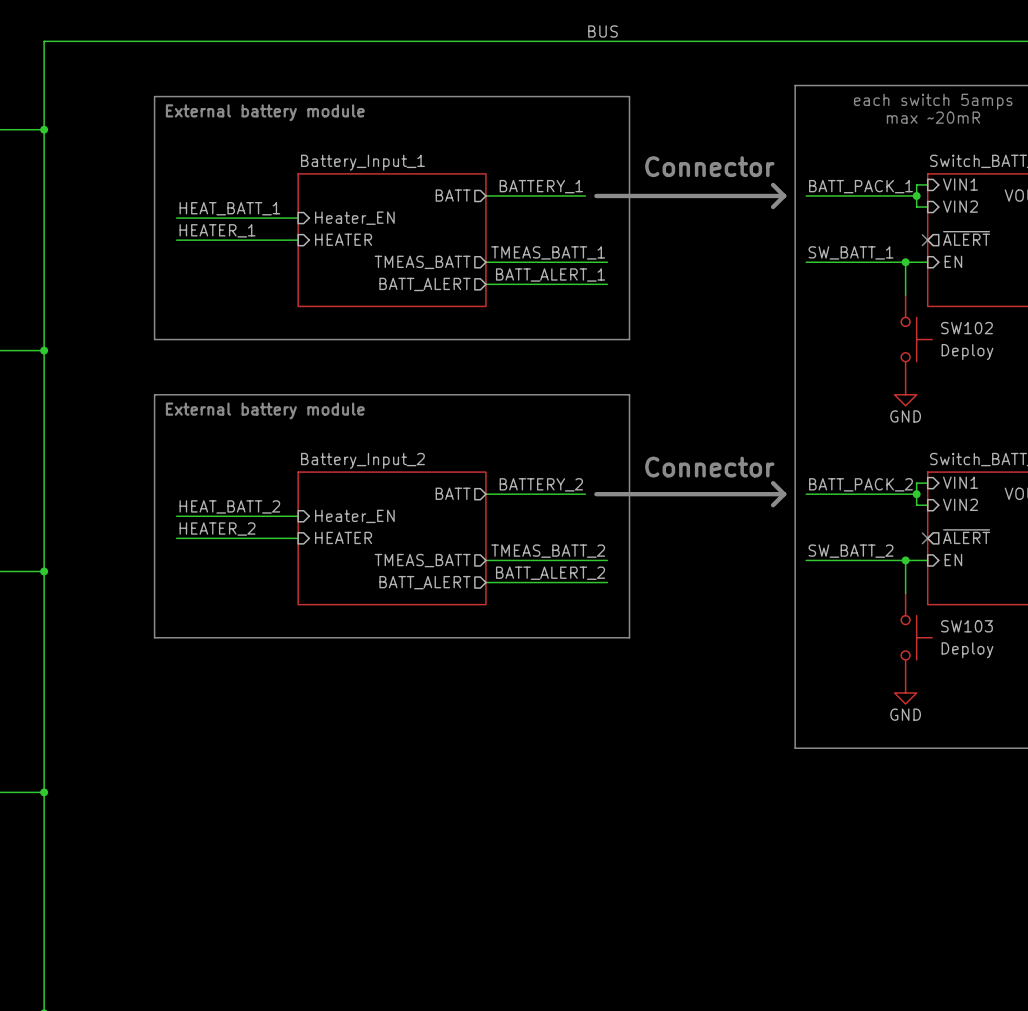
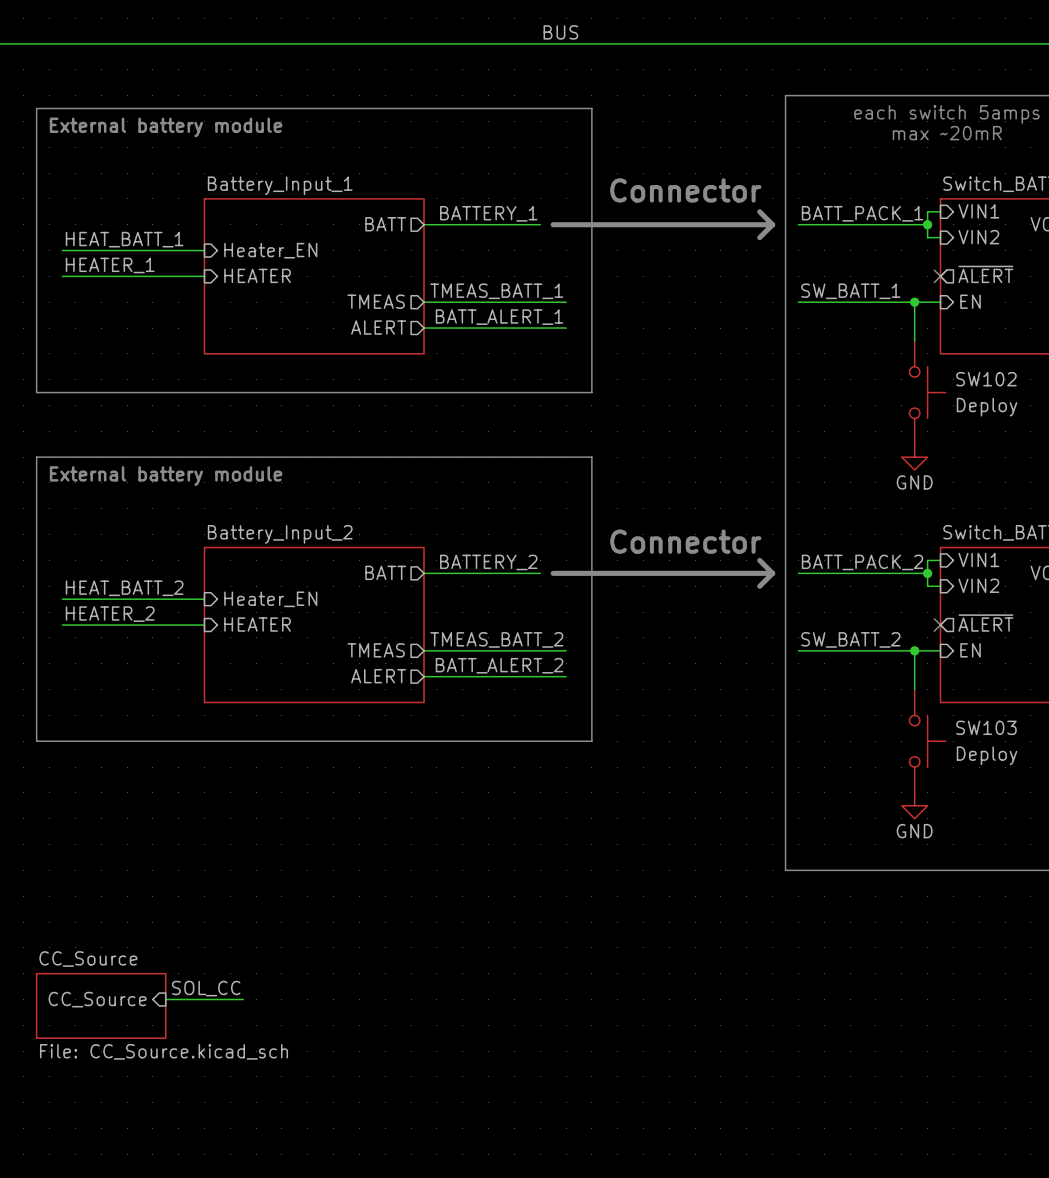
sheet pin: TMEAS_BATT (422, 262) -> TMEAS (376, 301)
sheet pin: BATT_ALERT (425, 284) -> ALERT (378, 327)
sheet pin: TMEAS_BATT (422, 560) -> TMEAS (376, 650)
sheet pin: BATT_ALERT (425, 582) -> ALERT (378, 676)
label: none -> SOL_CC (206, 988)
sheet pin: none -> CC_Source (97, 999)
wire: none -> (165, 999) (243, 999)
sheet CC_Source: none -> File: CC_Source.kicad_sch (101, 1005)

